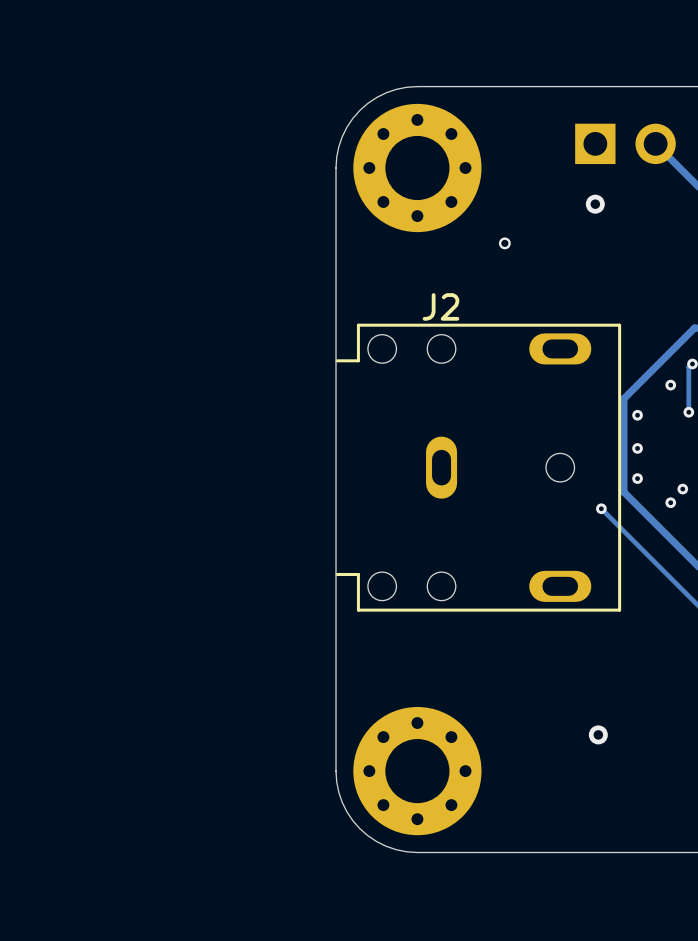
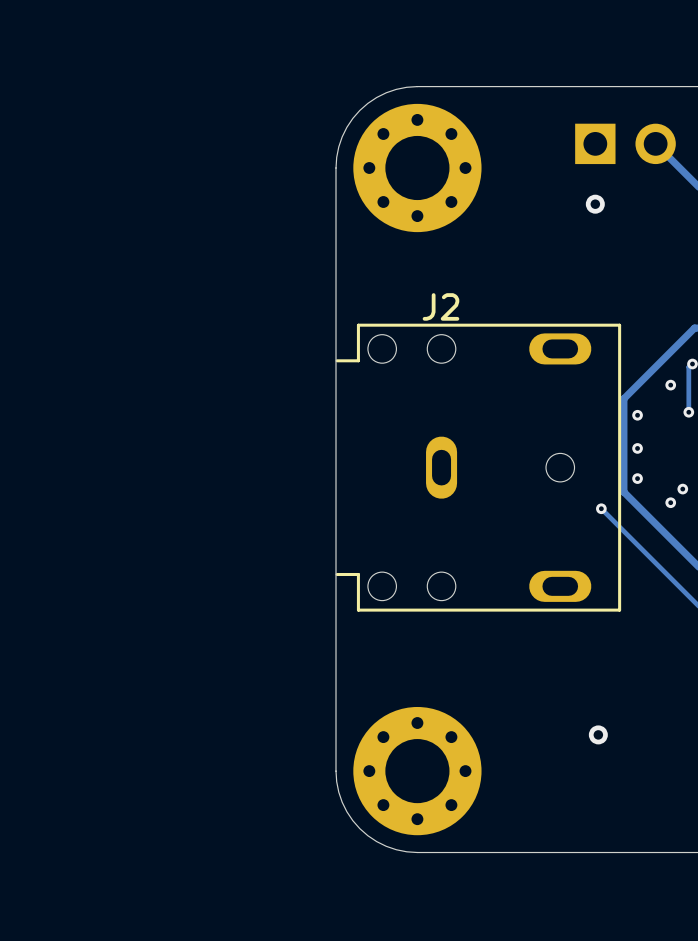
via: (504, 243) -> none

